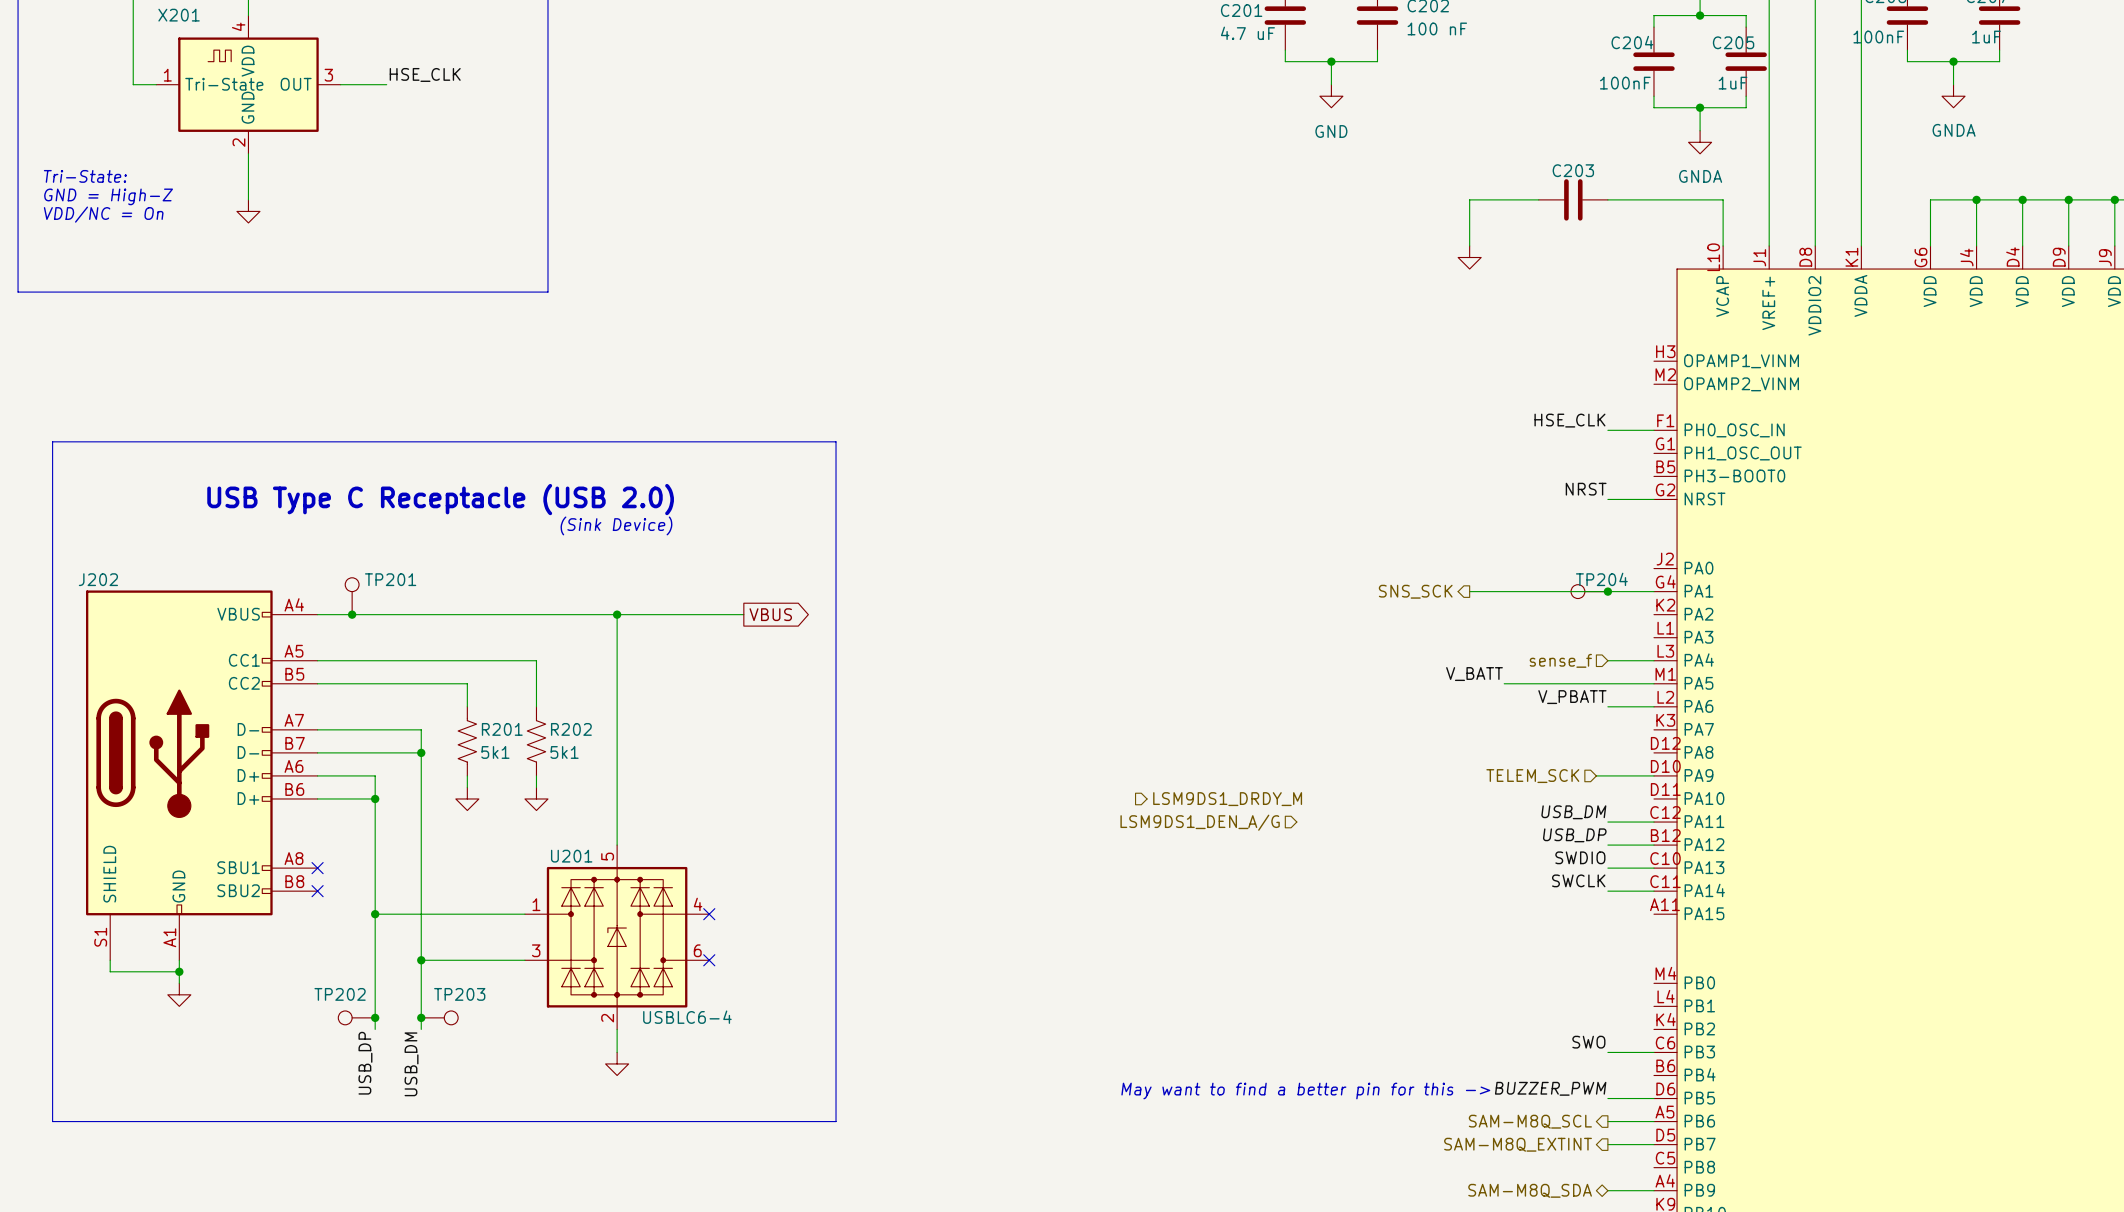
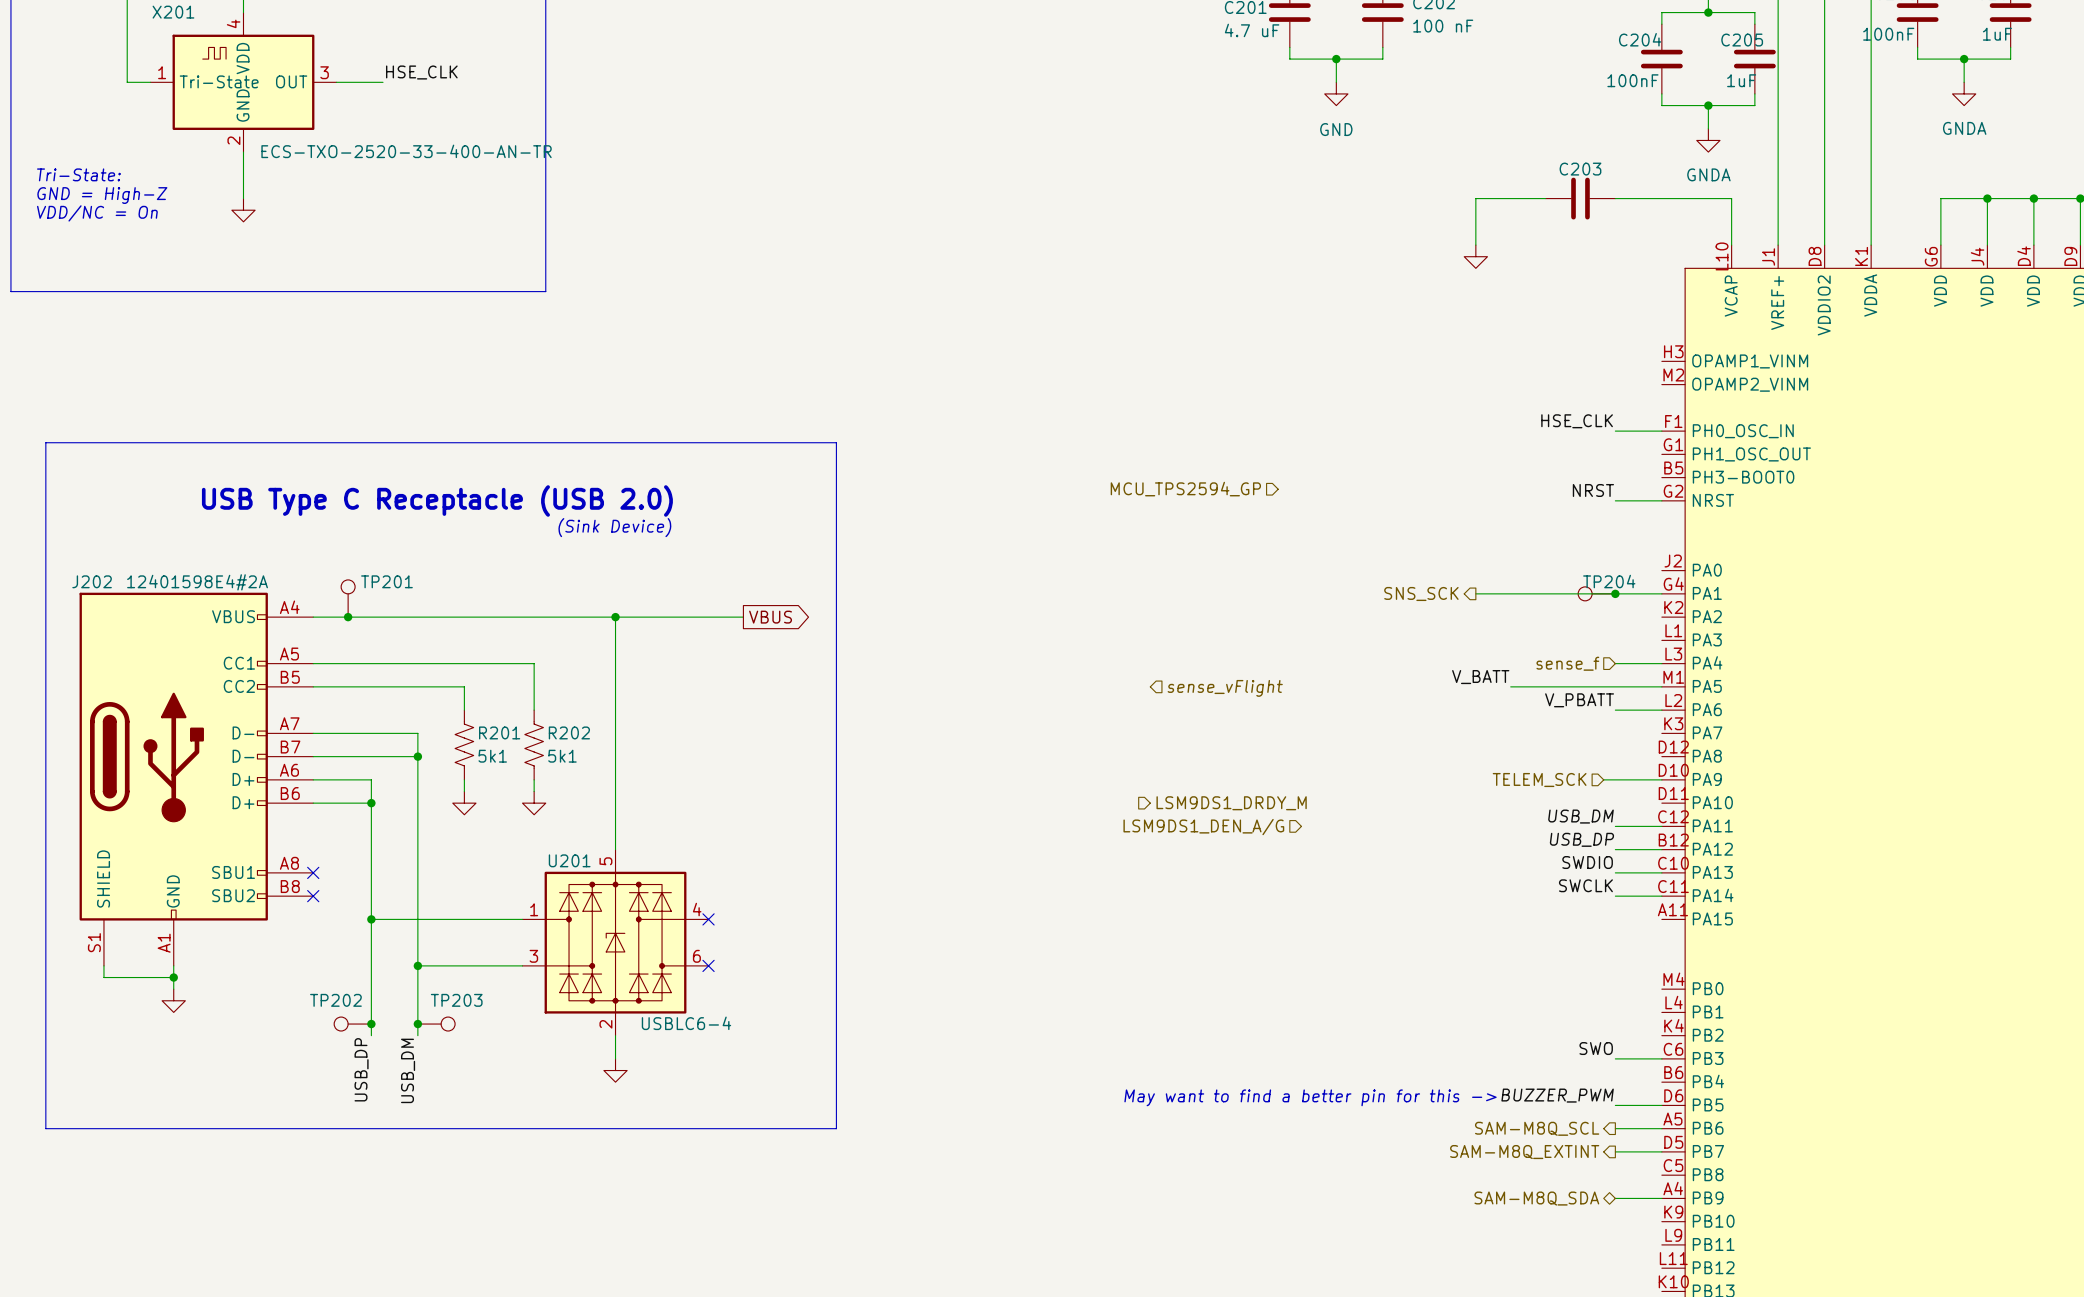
X201 value: none -> ECS-TXO-2520-33-400-AN-TR (406, 151)
hierarchical label: none -> MCU_TPS2594_GP (1185, 489)
J202 value: none -> 12401598E4#2A (197, 582)
hierarchical label: none -> sense_vFlight (1225, 688)

